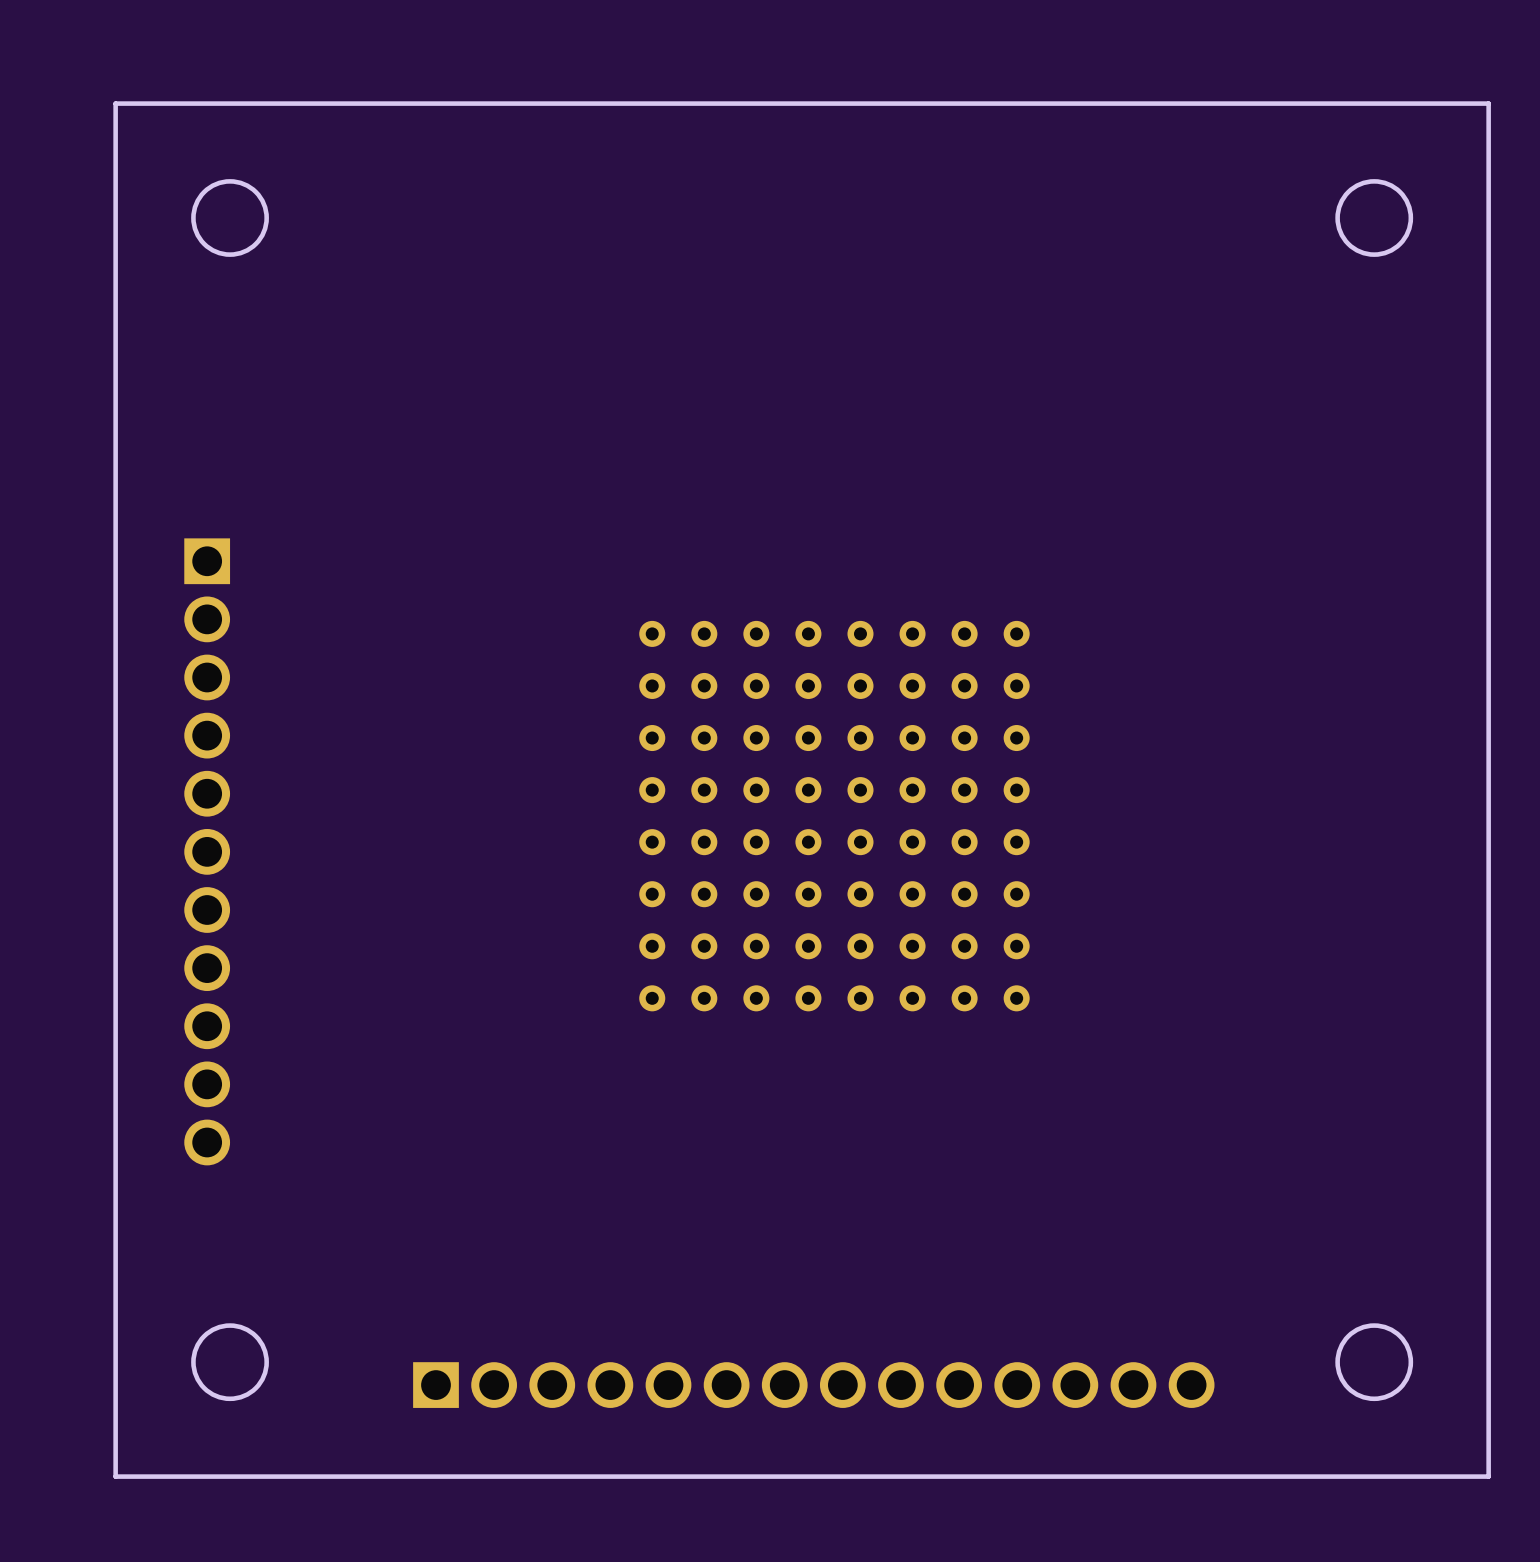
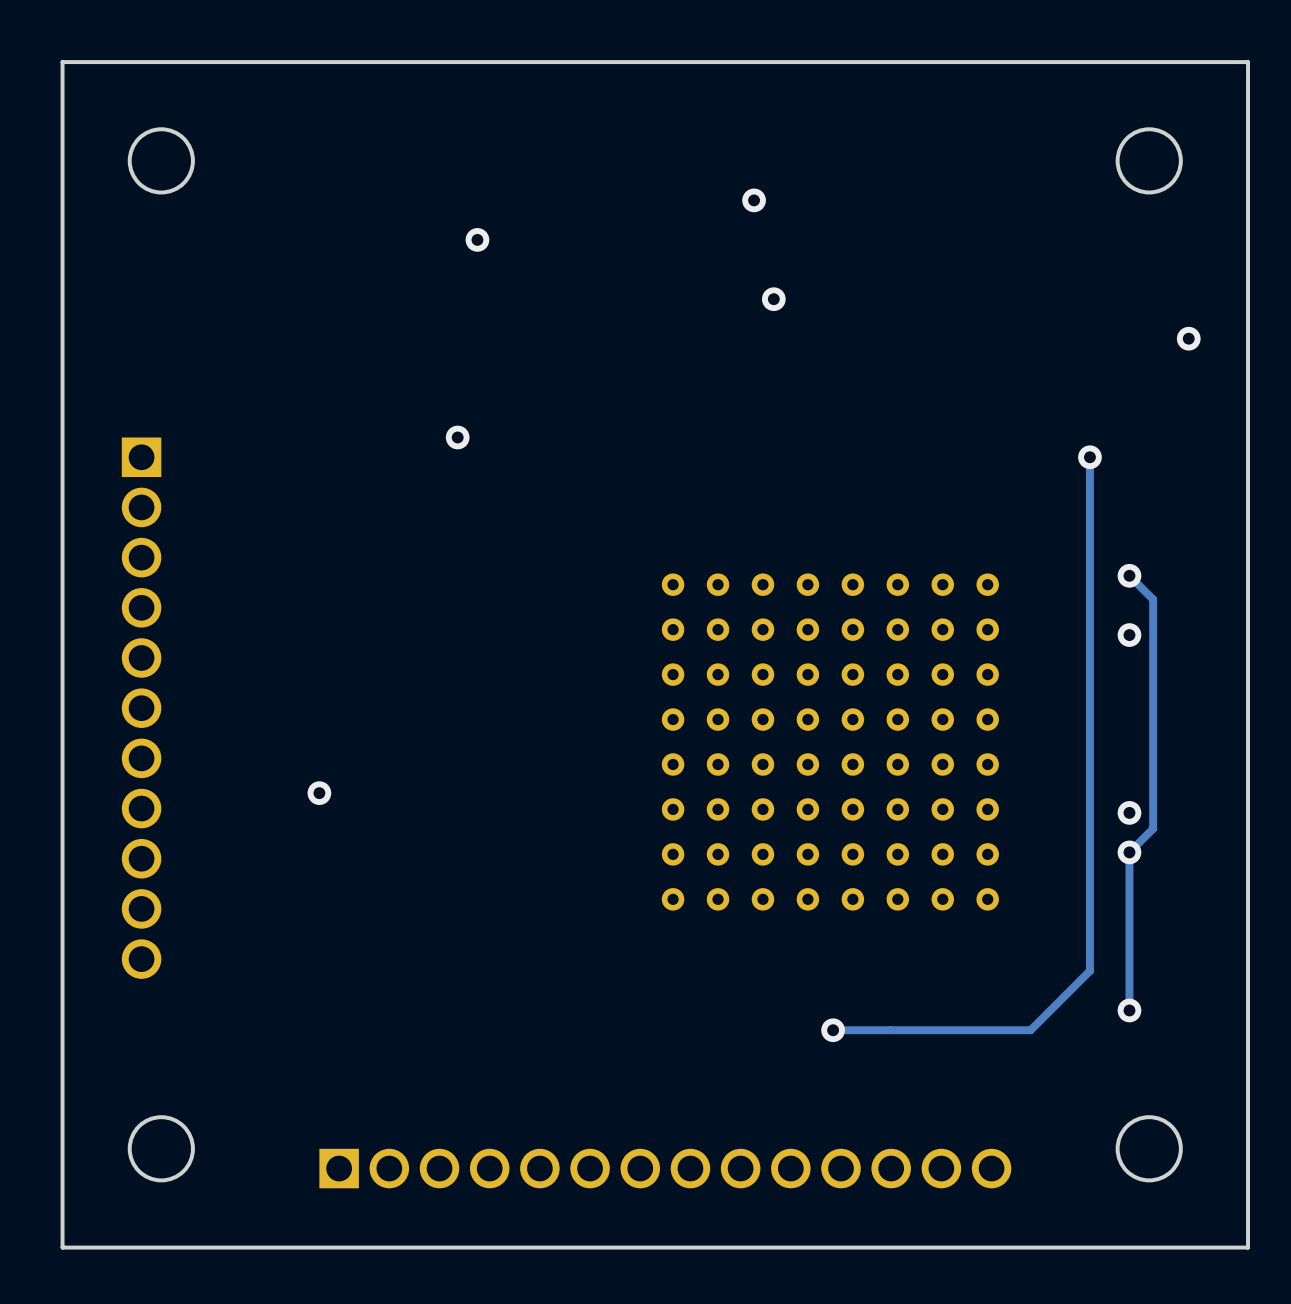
via: none -> (754, 200)
via: none -> (477, 239)
via: none -> (773, 299)
via: none -> (1188, 338)
via: none -> (457, 437)
track: none -> (1089, 457) (1089, 970) (1030, 1030) (833, 1030)
via: none -> (1089, 457)
track: none -> (1129, 575) (1153, 599) (1153, 828) (1129, 852) (1129, 1010)
via: none -> (1129, 575)
via: none -> (1129, 635)
part position: (834, 816) -> (830, 742)
via: none -> (319, 793)
via: none -> (1129, 812)
via: none -> (1129, 852)
via: none -> (1129, 1010)
via: none -> (833, 1030)

